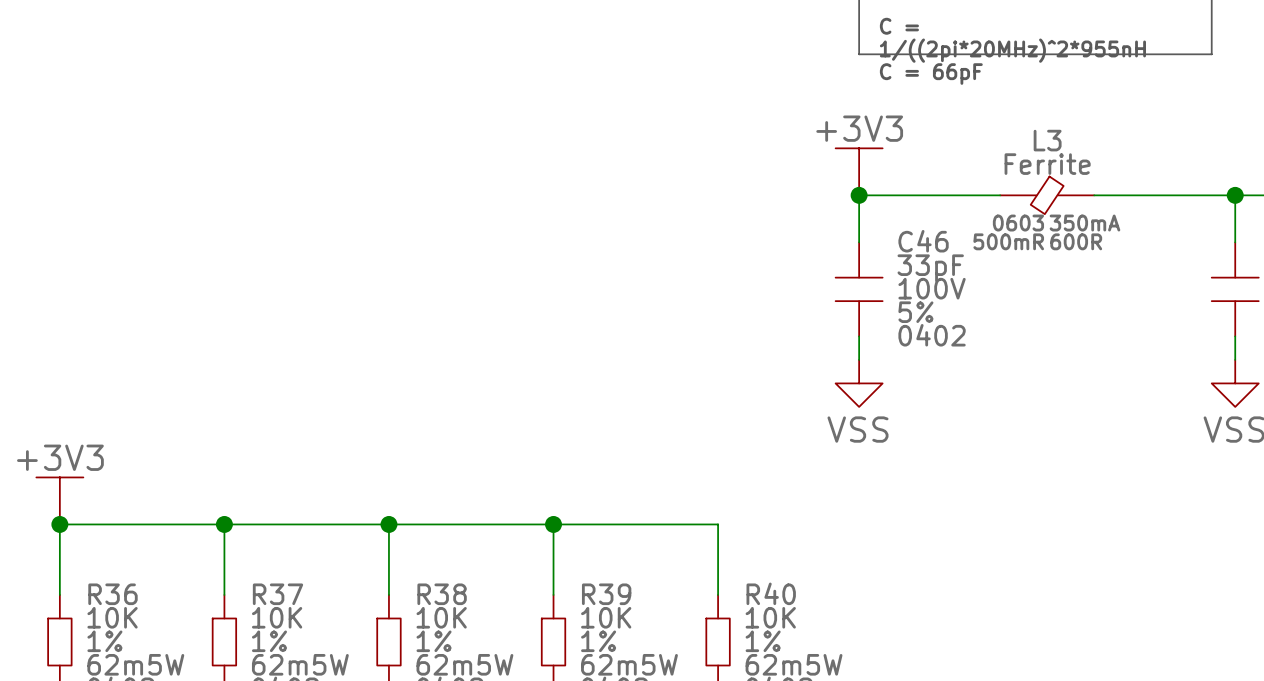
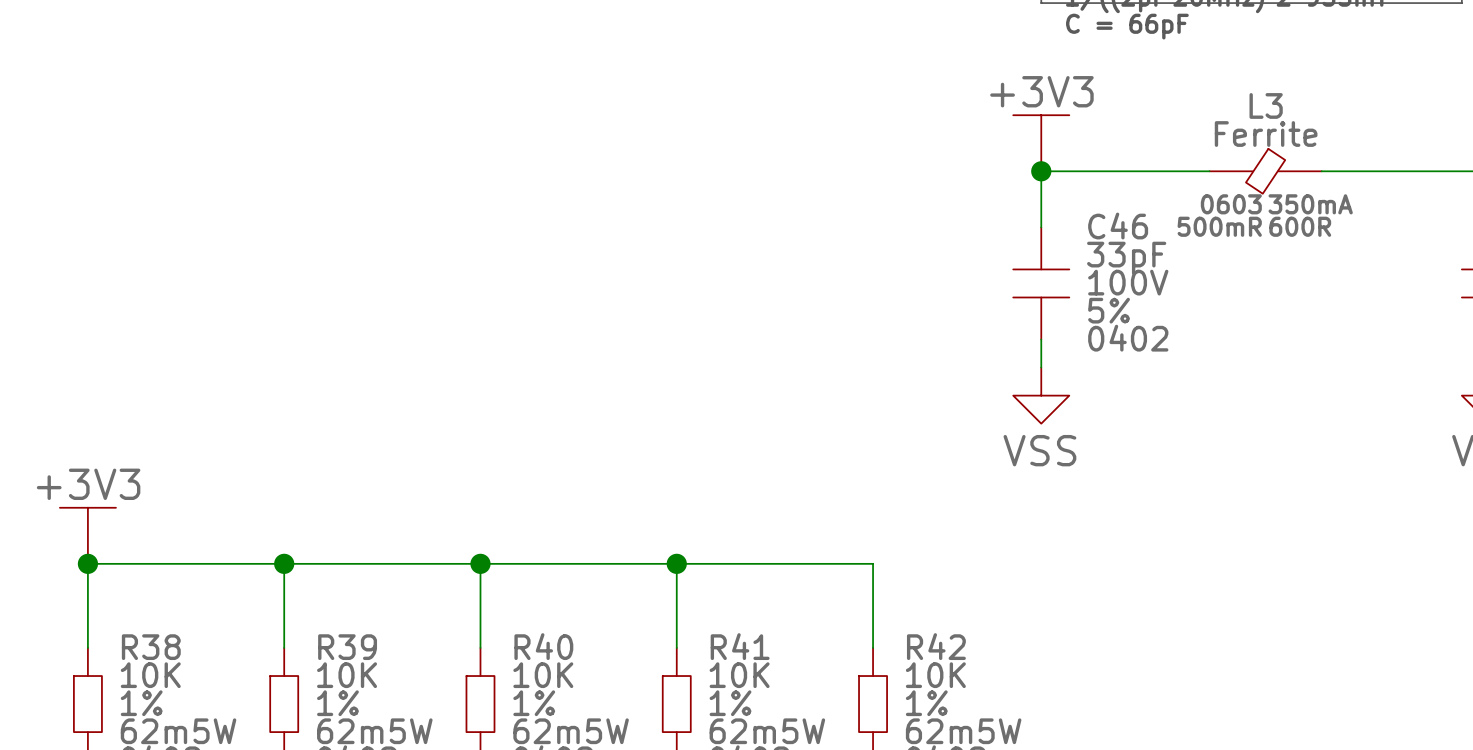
R40 name: R40 (771, 593) -> R42 (936, 646)
R36 name: R36 (112, 594) -> R38 (151, 647)
R37 name: R37 (277, 594) -> R39 (347, 647)
R38 name: R38 (442, 594) -> R40 (543, 646)
R39 name: R39 (606, 594) -> R41 (740, 646)

